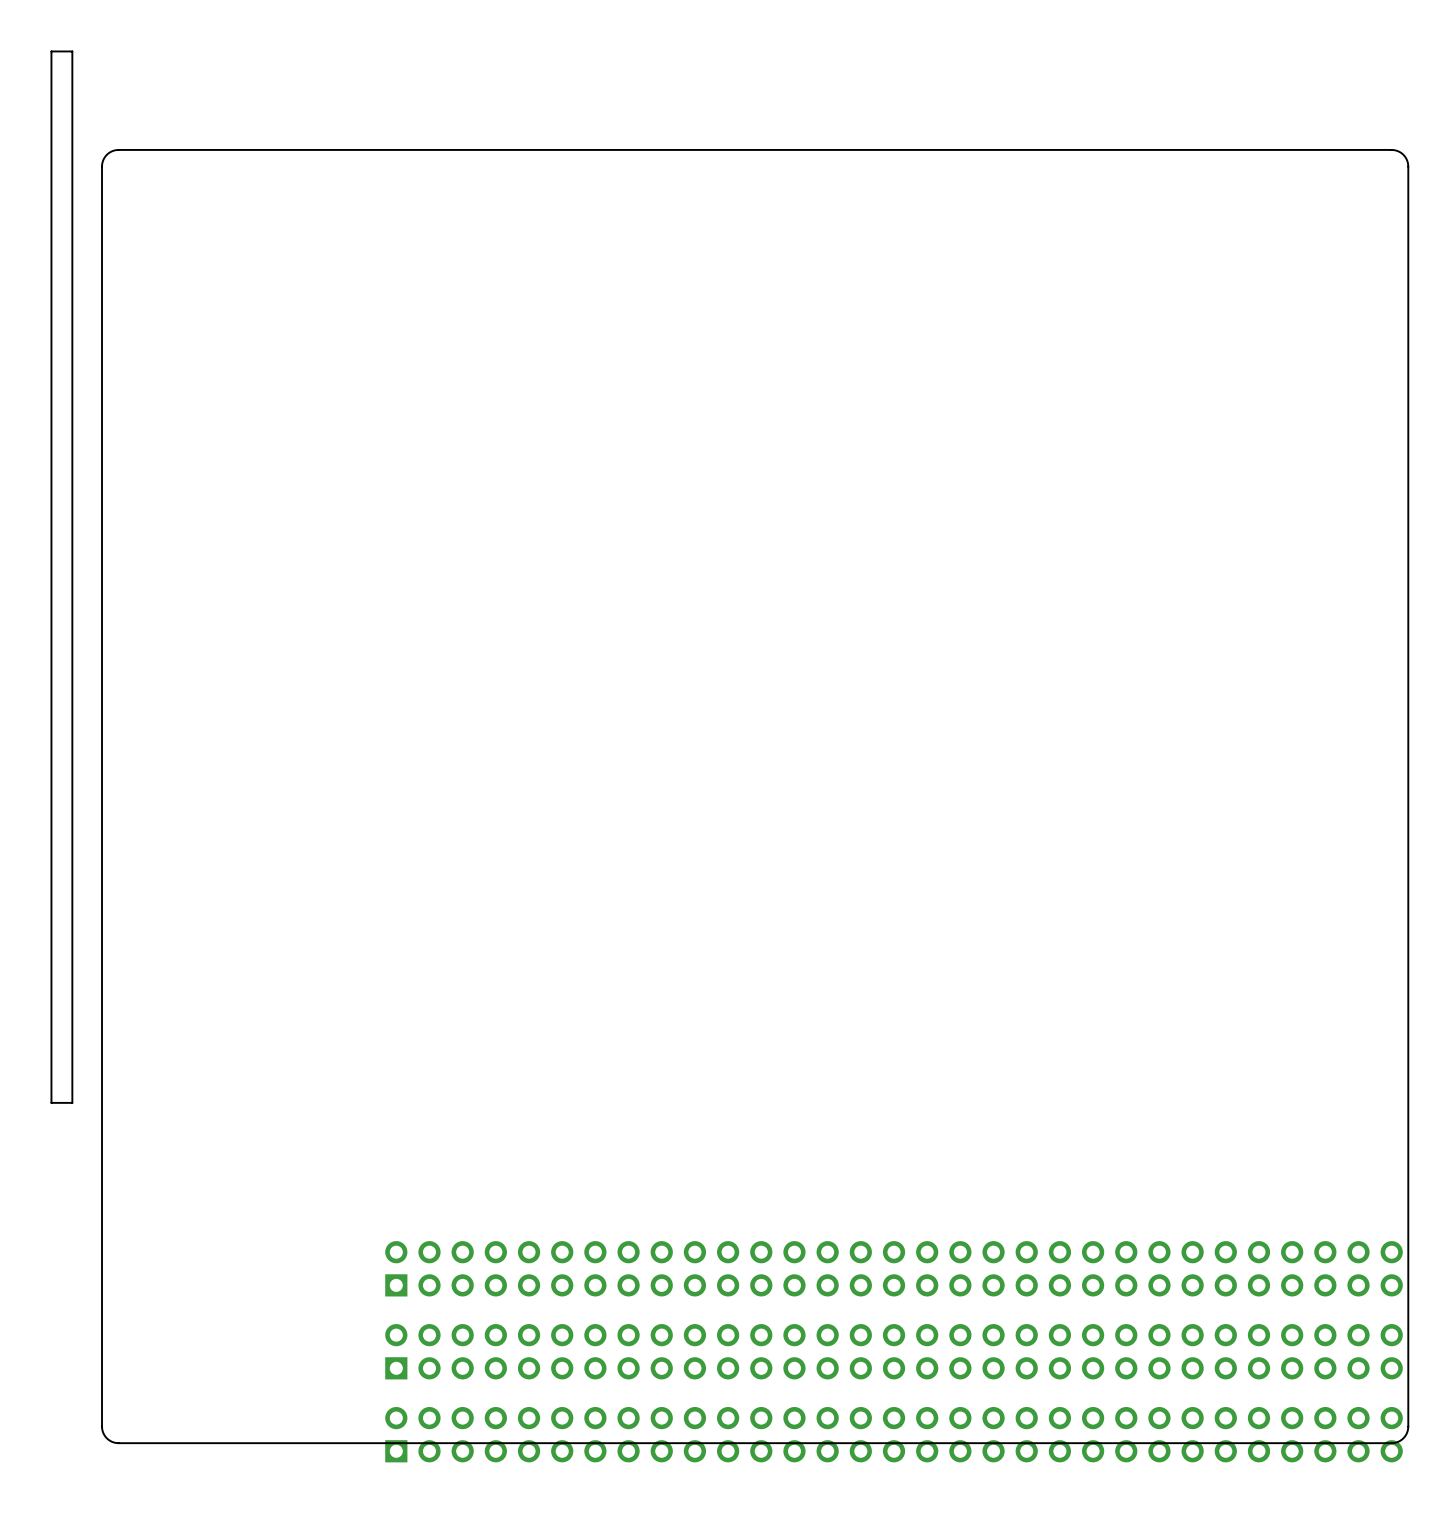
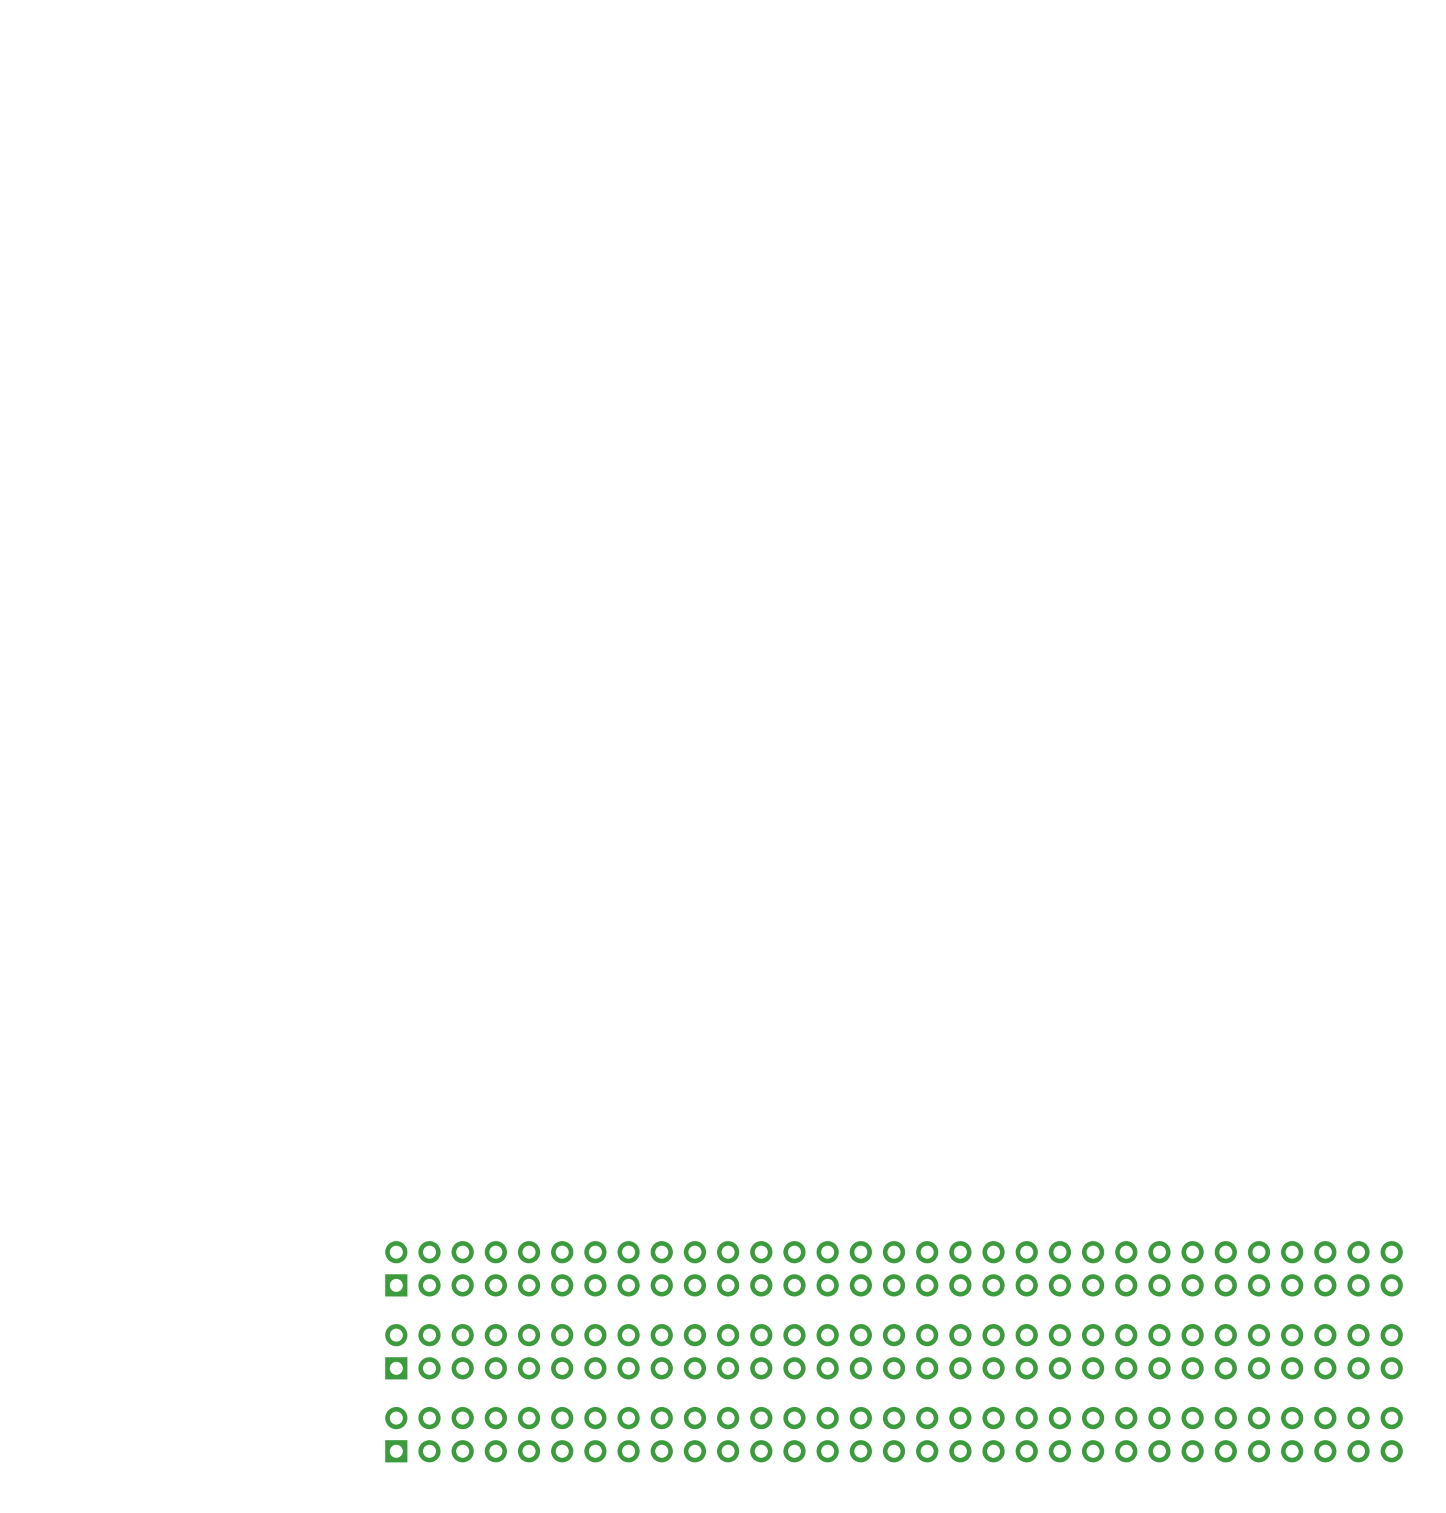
board edge: (72, 51) (51, 51) (51, 1102) (72, 1102) (72, 51) -> none
board edge: (1391, 149) (118, 149) (106, 154) (102, 166) (102, 1426) (106, 1438) (118, 1443) (1391, 1443) (1403, 1438) (1408, 1426) (1408, 166) (1403, 154) (1391, 149) -> none

